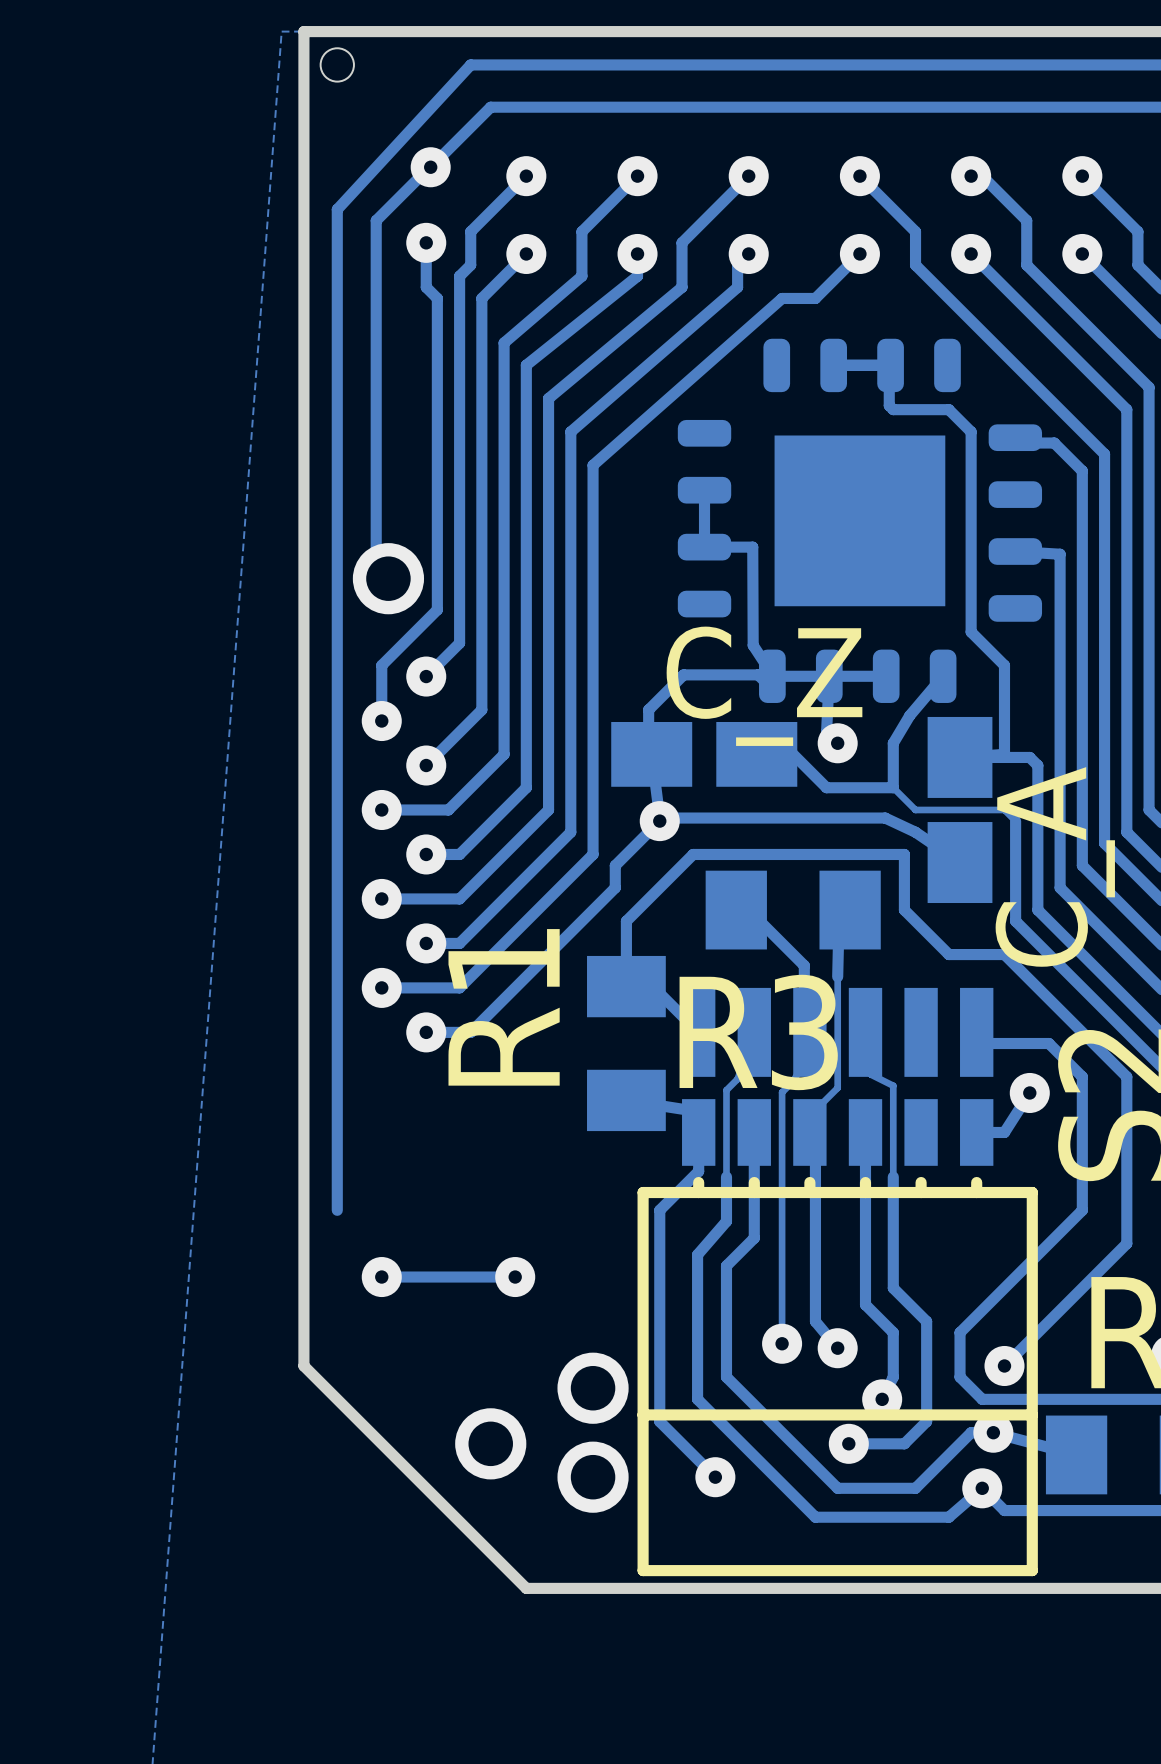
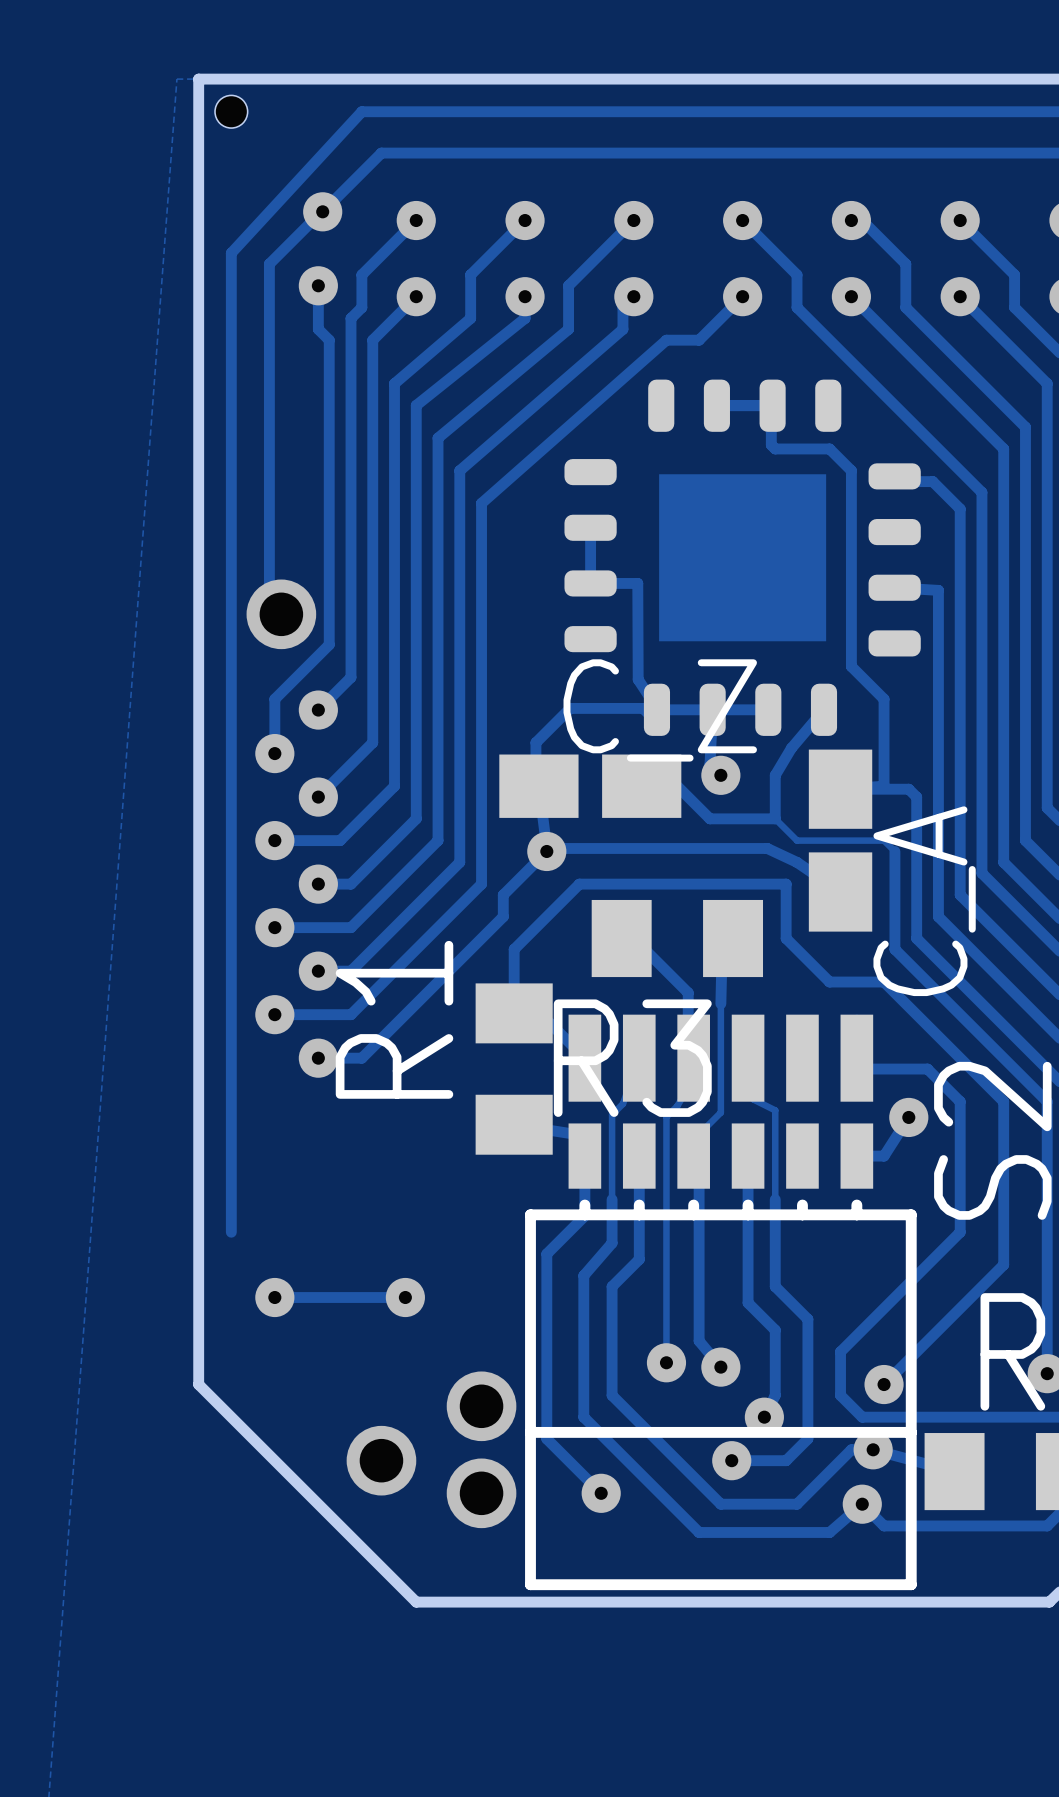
track: (698, 1171) (659, 1210) (659, 1232) -> (584, 1194) (584, 1215) (546, 1253)
track: (893, 1265) (893, 1288) (926, 1321) -> (775, 1286) (807, 1319) (807, 1341)
track: (865, 1282) (865, 1304) (893, 1332) -> (748, 1302) (775, 1330) (775, 1351)

